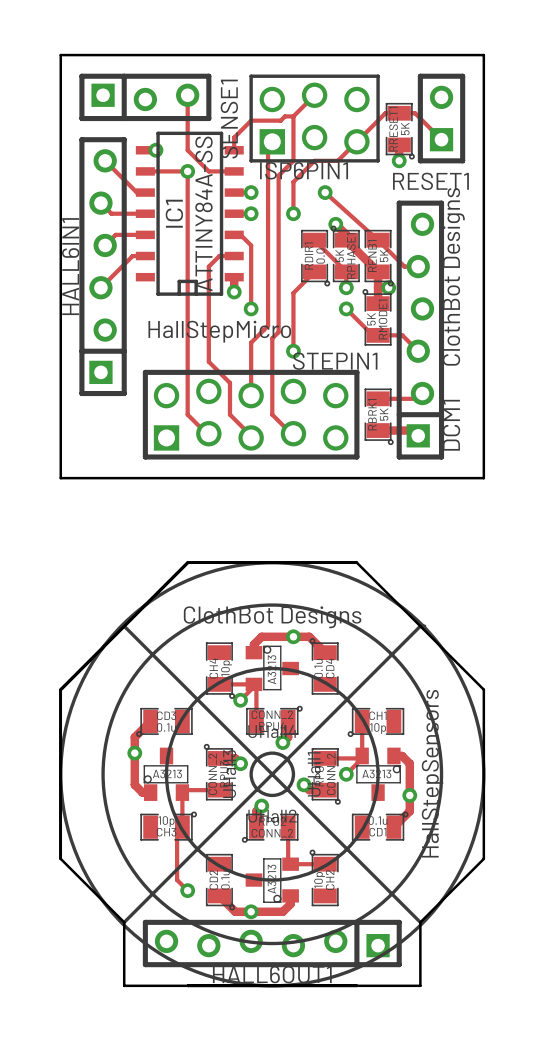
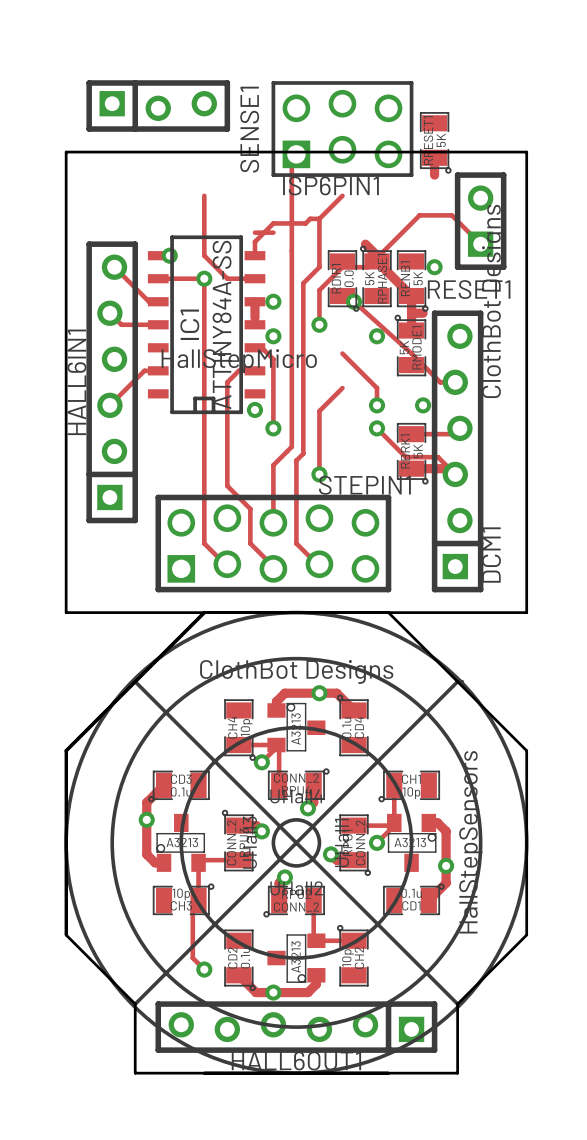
track: (187, 95) (187, 150) (208, 171) (234, 171) -> none
track: (314, 95) (293, 116) -> none
track: (293, 116) (293, 160) (278, 175) (278, 260) -> (319, 232) (319, 267) (303, 283)
track: (293, 116) (284, 116) (280, 120) (251, 120) (234, 137) (234, 150) -> none
RESET1 position: (441, 118) -> (480, 221)
board edge: (60, 139) (60, 55) (483, 55) (483, 139) -> (66, 152) (526, 152)
track: (441, 139) (415, 113) (385, 113) (337, 160) (314, 160) (293, 181) (293, 201) -> none
via: (155, 150) -> none
track: (105, 160) (136, 192) (145, 192) -> none
via: (399, 160) -> none
track: (145, 171) (187, 171) (187, 179) -> none
via: (187, 171) -> none
via: (251, 192) -> none
track: (325, 192) (404, 266) (418, 266) -> none
via: (325, 192) -> none
track: (100, 203) (111, 213) (145, 213) -> none
IC1 position: (189, 213) -> (206, 324)
via: (251, 213) -> none
via: (293, 213) -> none
via: (335, 224) -> none
track: (145, 234) (115, 234) (105, 245) -> (158, 301) (149, 301) (114, 267)
via: none -> (169, 255)
track: (187, 234) (187, 256) -> (204, 255) (227, 278) (238, 278)
track: (234, 234) (240, 234) (251, 245) (251, 308) -> (254, 255) (254, 241) (273, 223) (305, 223) (310, 218) (319, 218) (342, 195)
track: (314, 240) (346, 271) (346, 287) -> (342, 353) (377, 388) (377, 405)
via: none -> (434, 267)
track: (145, 256) (132, 256) (100, 287) -> (158, 324) (121, 324) (109, 313)
track: none -> (158, 278) (204, 278)
via: none -> (204, 278)
track: (219, 256) (208, 266) (208, 351) -> (254, 370) (238, 370) (227, 382)
HALL6IN1 position: (103, 266) -> (112, 382)
track: (314, 271) (293, 293) -> (480, 244) (451, 215) (419, 215) (367, 267) (342, 267) (319, 290) (319, 319)
via position: (346, 287) -> (353, 301)
via: (388, 287) -> none
via position: (234, 291) -> (273, 301)
track: (293, 298) (293, 351) -> none
via: none -> (319, 324)
track: (346, 308) (372, 335) (402, 335) (418, 351) -> (353, 301) (440, 382) (455, 382)
track: (268, 325) (251, 342) -> (254, 347) (261, 347) (273, 359) (273, 373)
DCM1 position: (420, 330) -> (457, 451)
track: (278, 332) (272, 338) (272, 414) (293, 433) -> (303, 361) (303, 453) (296, 460) (296, 543) (317, 564) (319, 564)
track: none -> (158, 370) (144, 370) (109, 405)
via: (293, 351) -> none
track: none -> (342, 388) (319, 411) (319, 474)
track: (208, 361) (229, 382) (229, 414) (251, 435) -> (291, 354) (291, 446) (273, 465) (273, 474)
track: none -> (227, 393) (227, 485) (250, 508) (250, 543) (273, 566) (273, 568)
via: none -> (377, 405)
via: none -> (423, 405)
via: none -> (254, 409)
via: none -> (273, 428)
track: none -> (377, 428) (405, 457) (438, 457) (455, 474)
via: none -> (377, 428)
track: (187, 414) (208, 433) -> (204, 451) (204, 543) (225, 564) (227, 564)
STEPIN1 position: (251, 414) -> (273, 543)
via: none -> (319, 474)
track: none -> (273, 476) (273, 522)
board edge: (60, 478) (483, 478) -> (66, 520) (66, 612) (204, 612)
board edge: none -> (526, 520) (526, 612) (388, 612)

